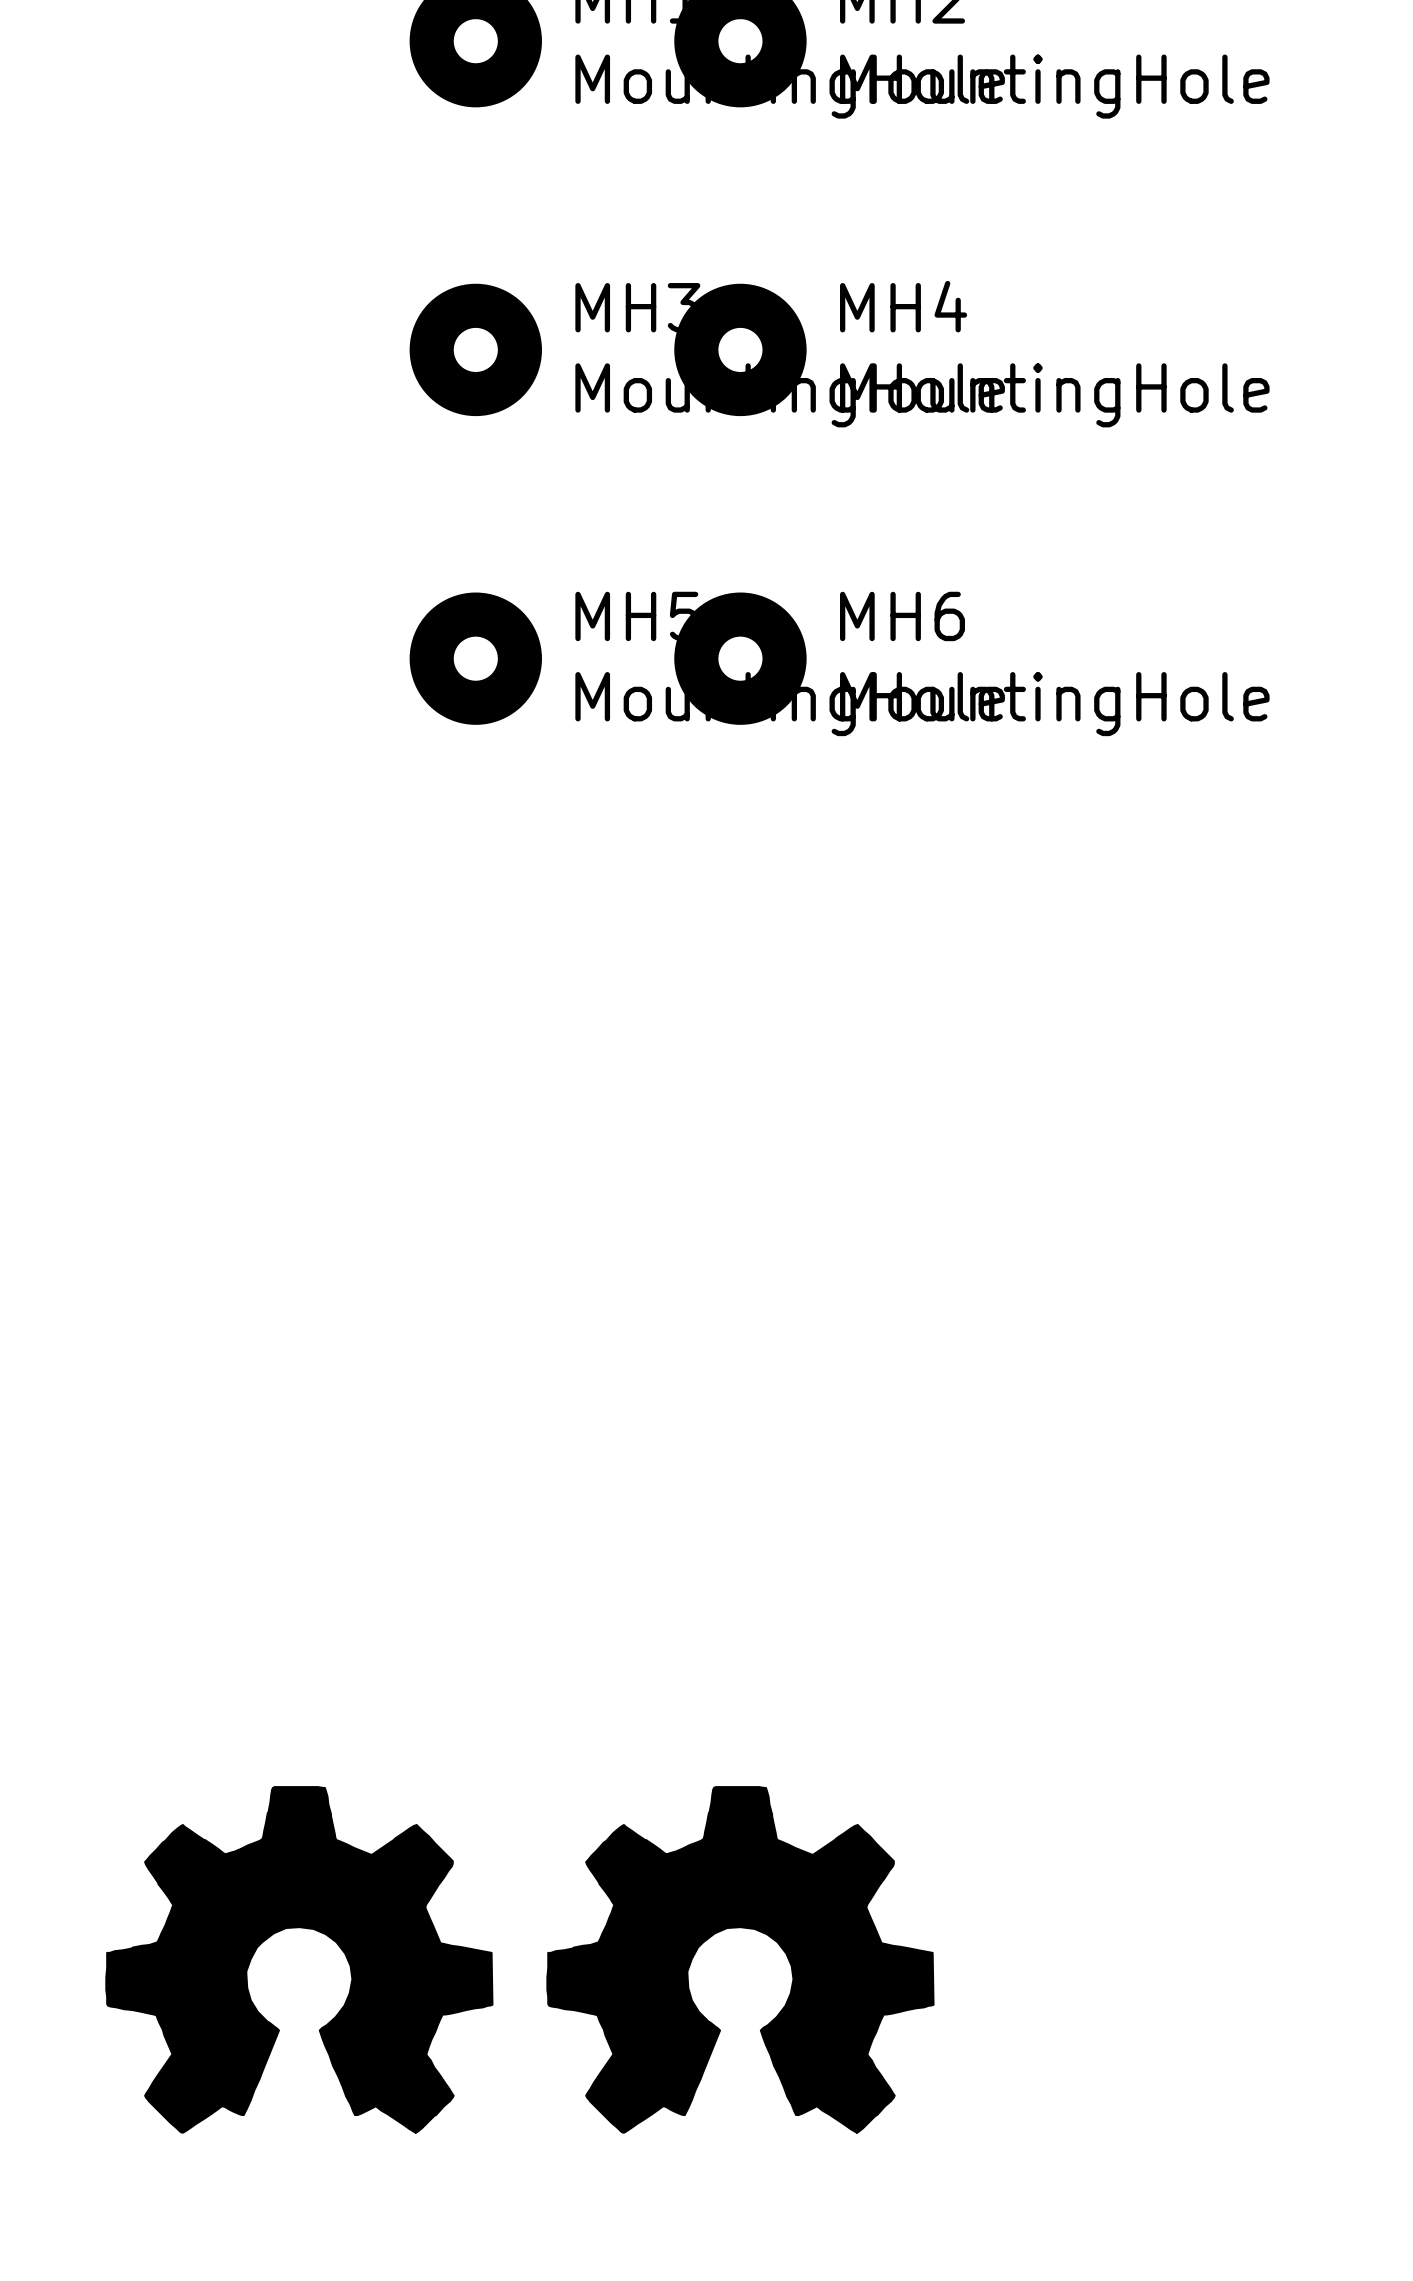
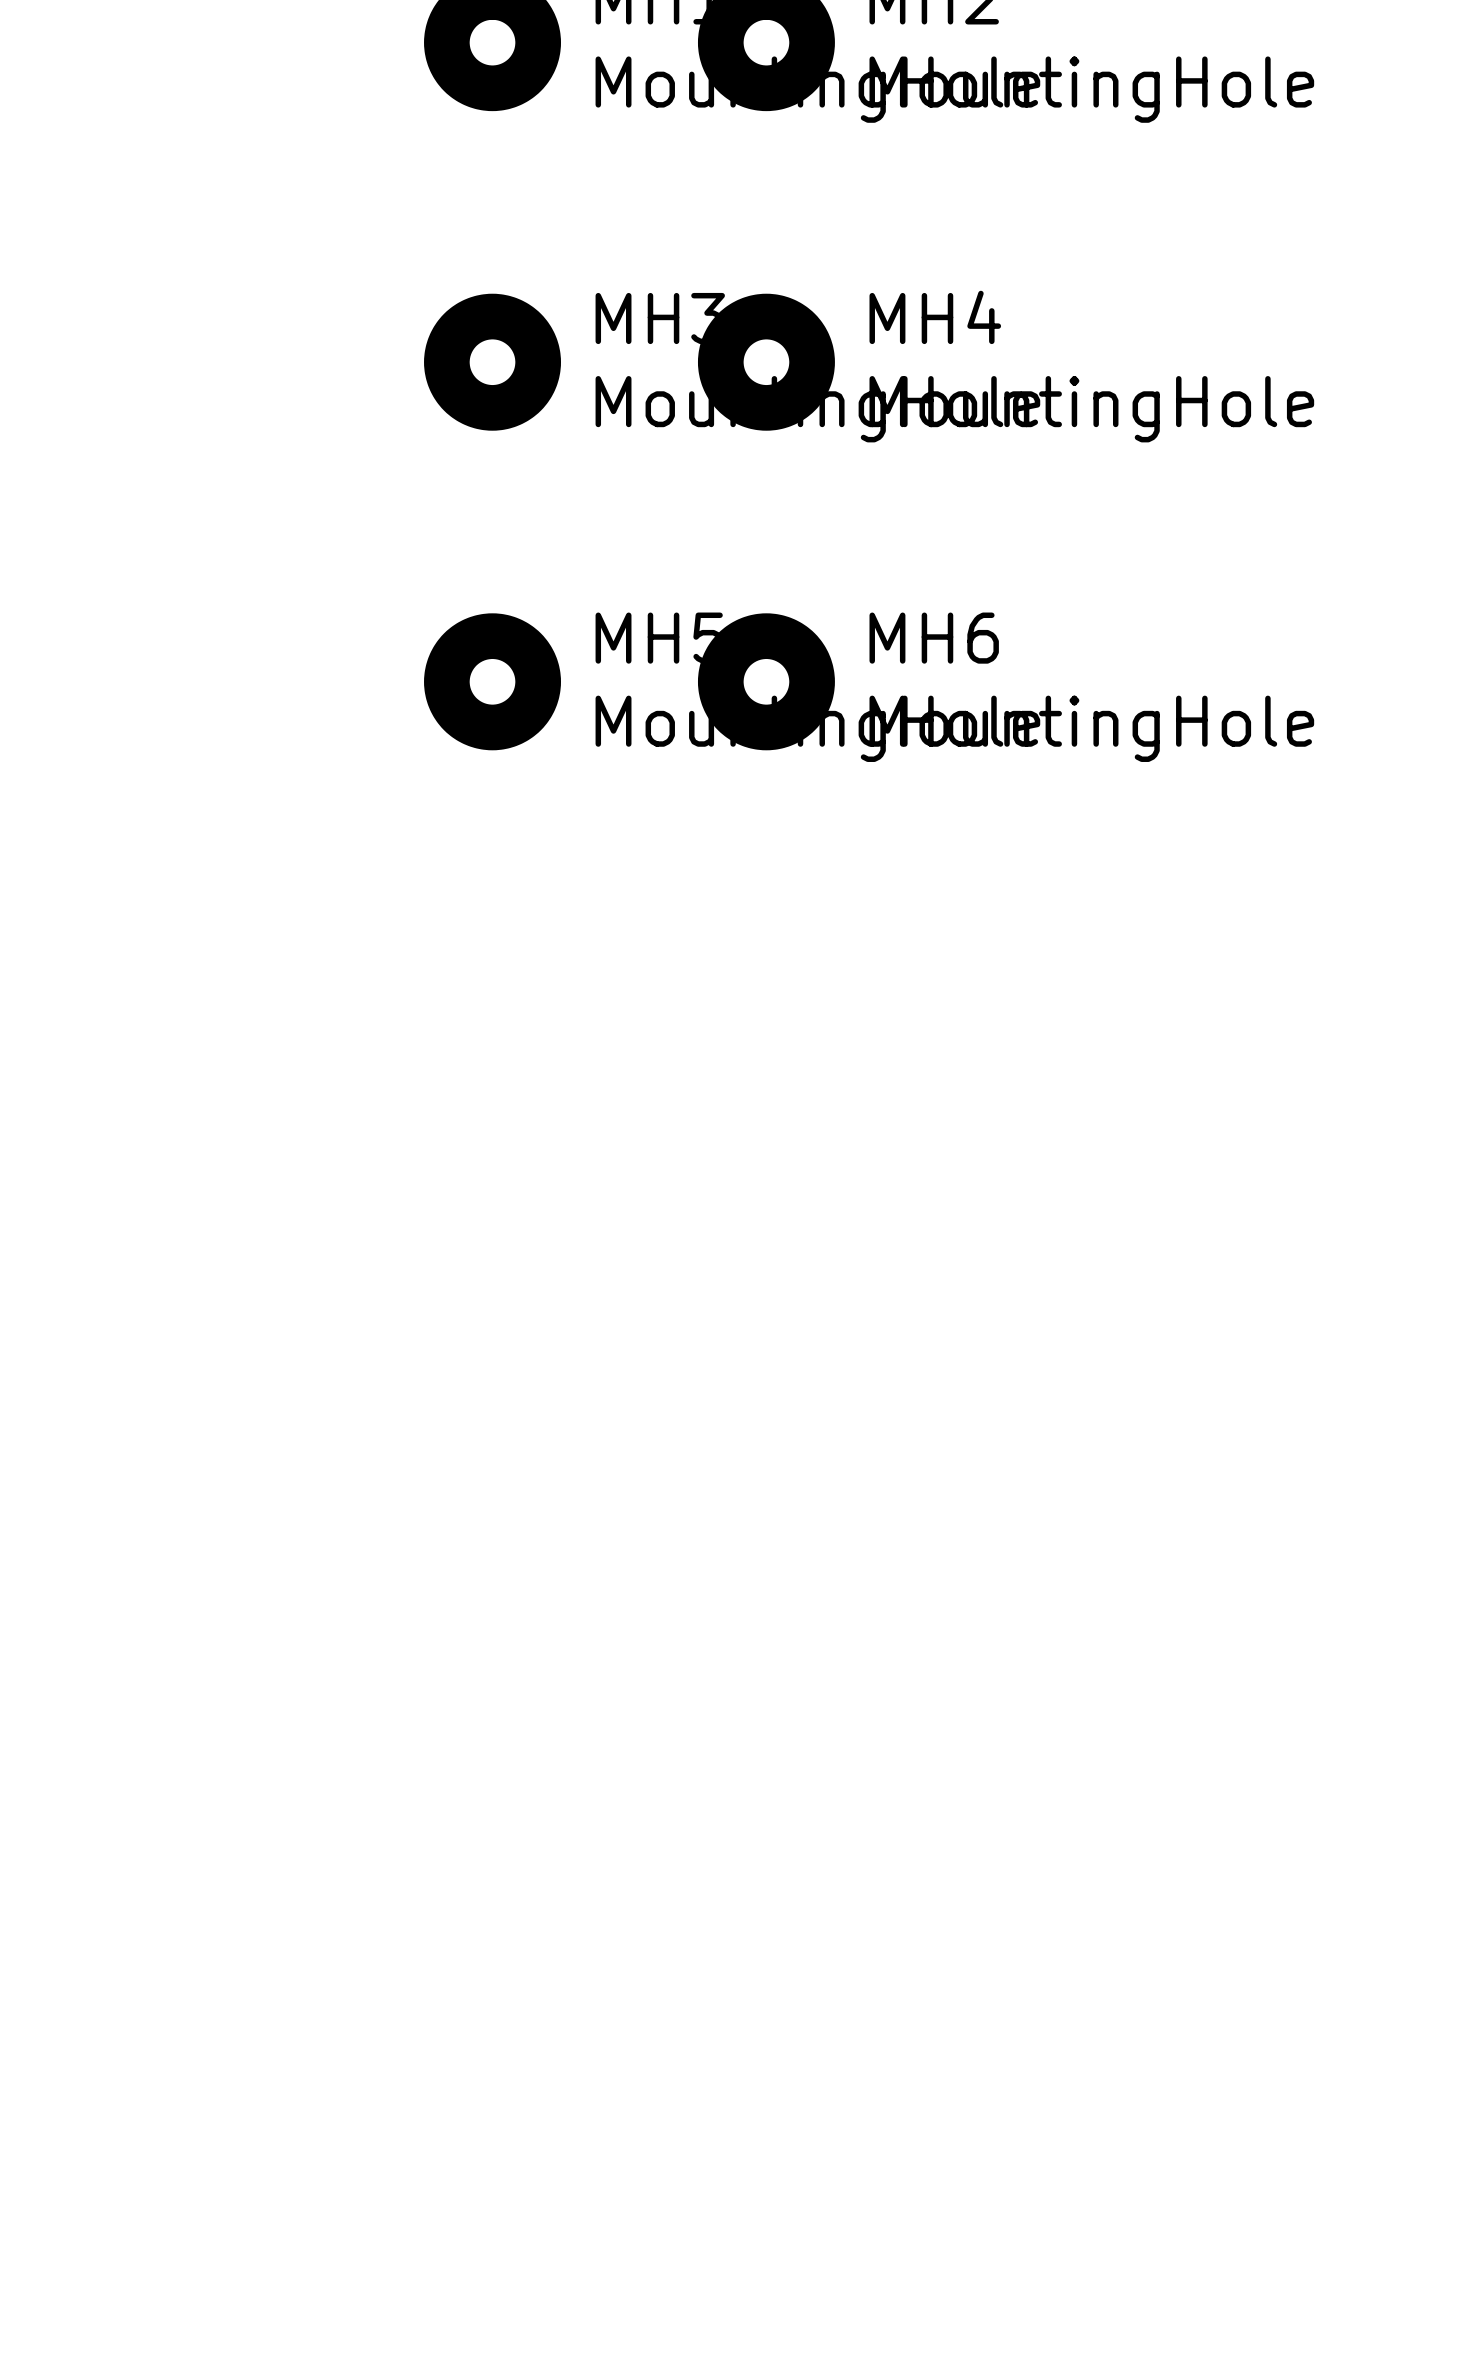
part: (299, 1959) -> none
part: (740, 1959) -> none

